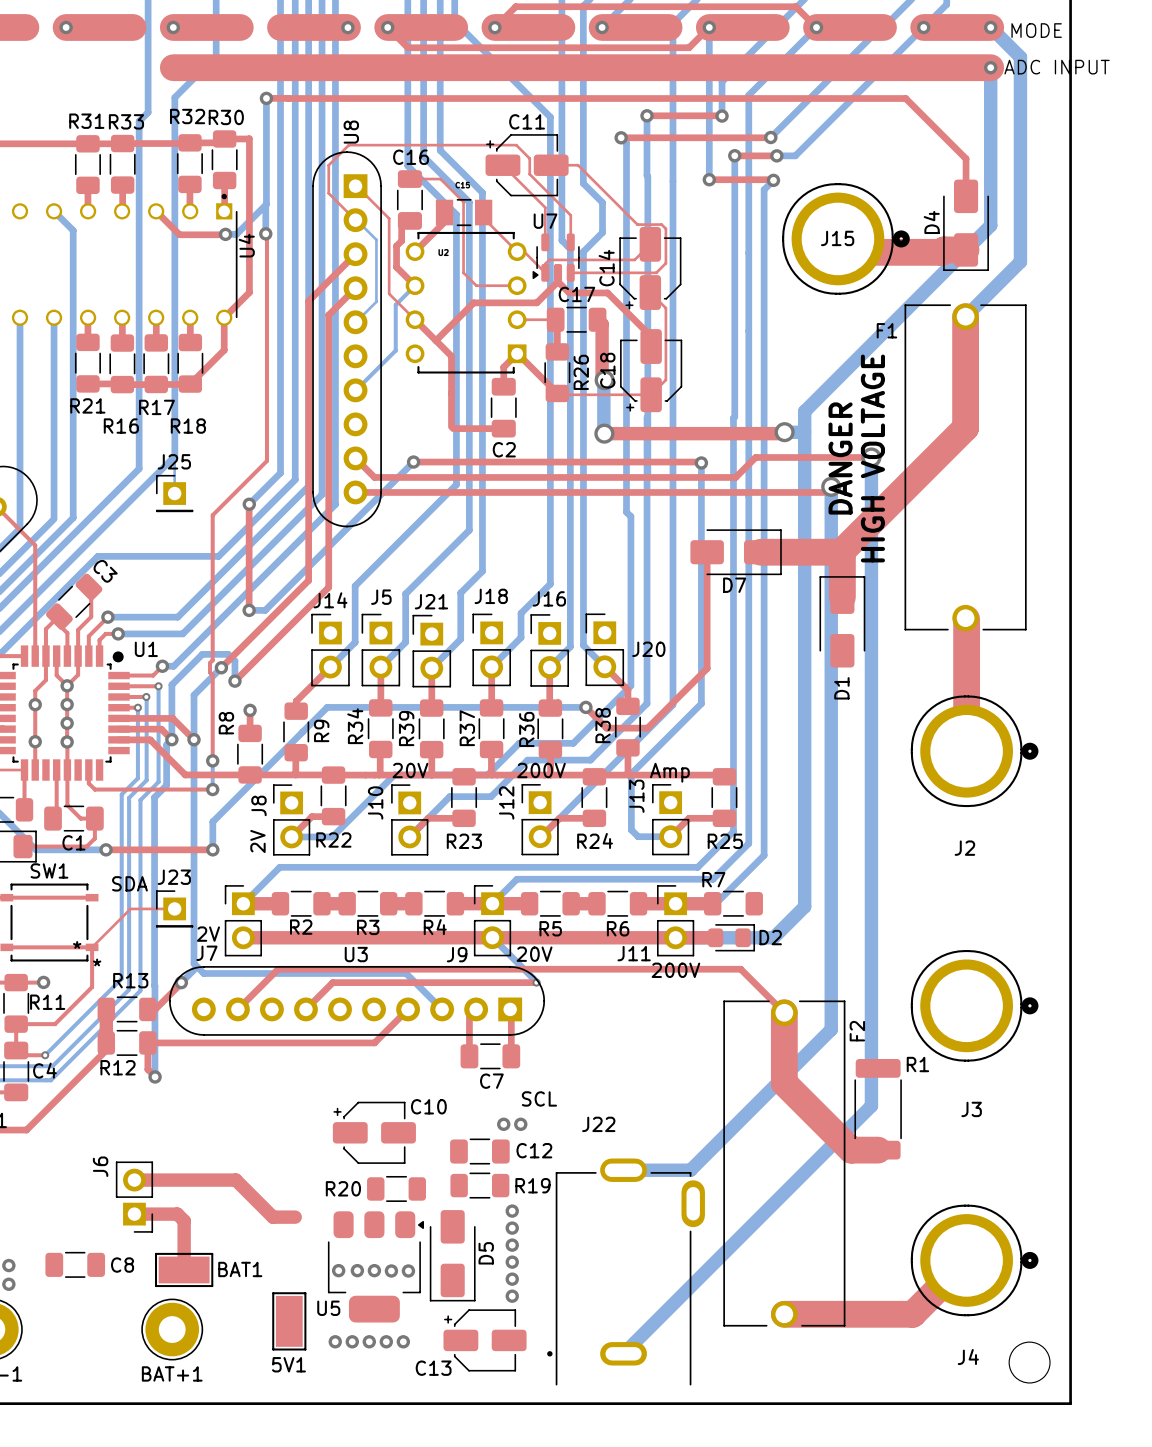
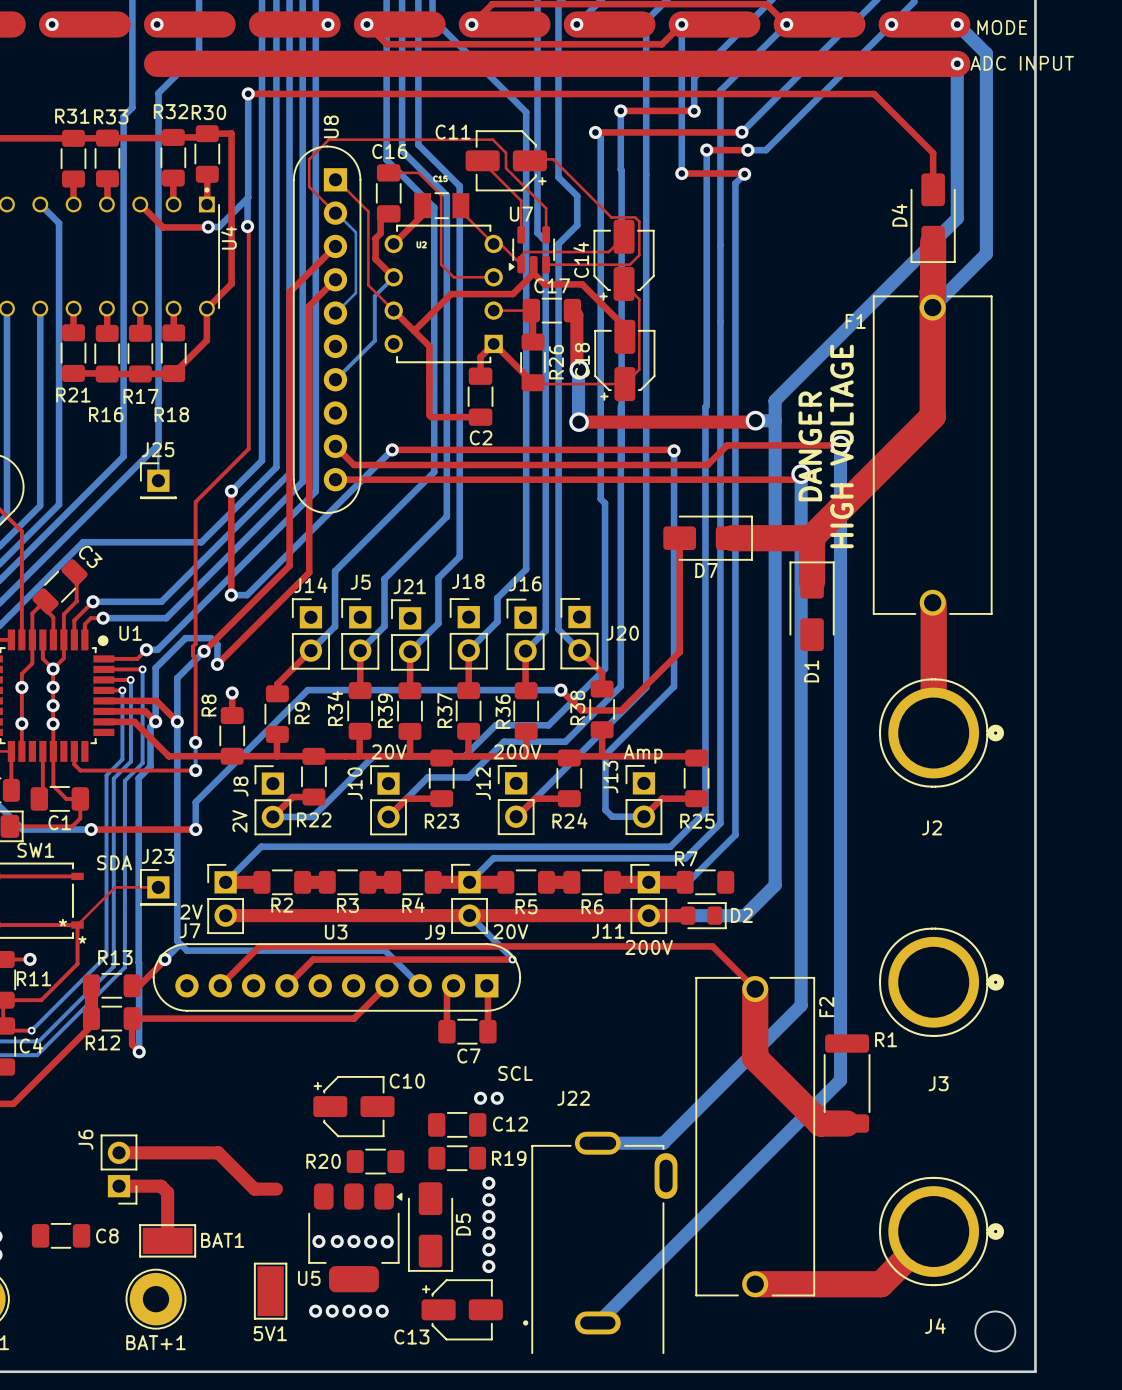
C11 name position: C11 (527, 121) -> C11 (453, 132)
C11 rotation: 0° (527, 165) -> 180° (506, 160)
top track: (837, 238) (851, 252) (941, 252) (944, 249) (966, 249) -> (932, 307) (933, 242)
J15: (845, 238) -> none

